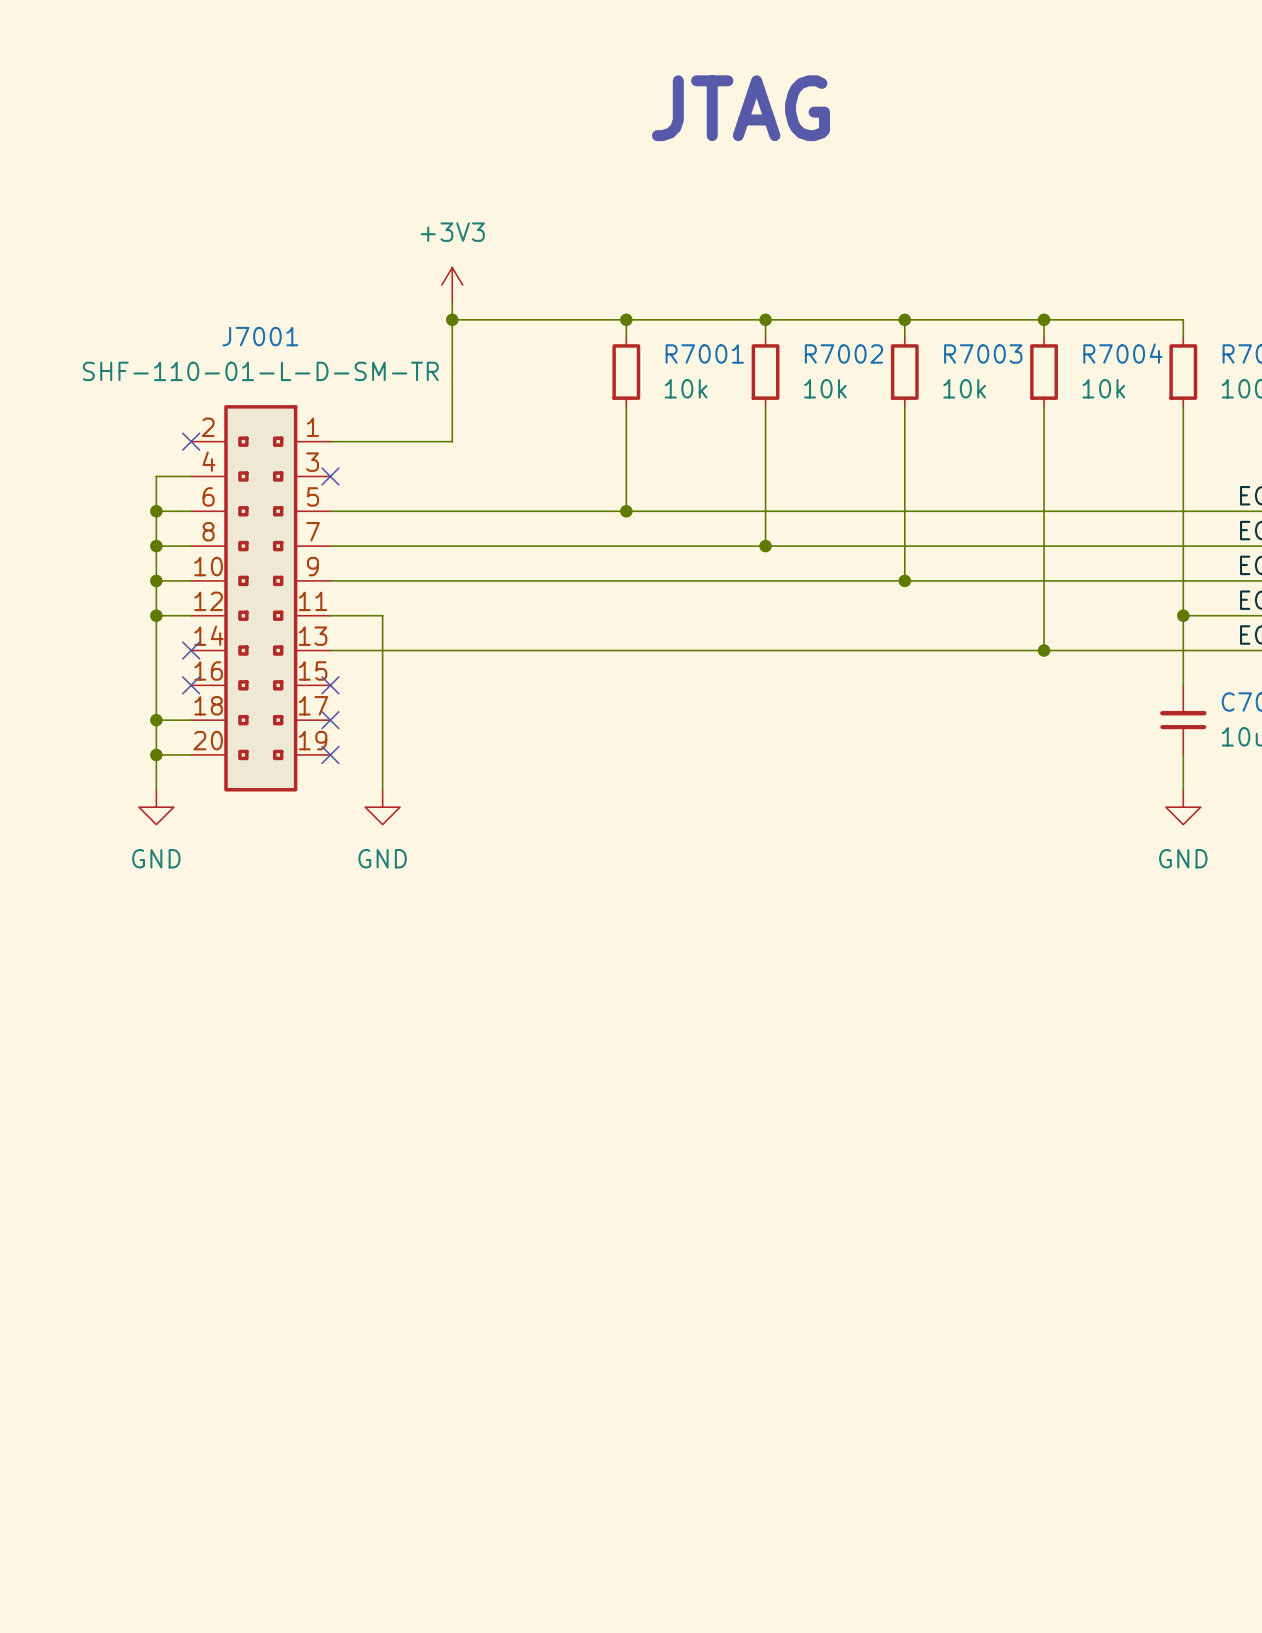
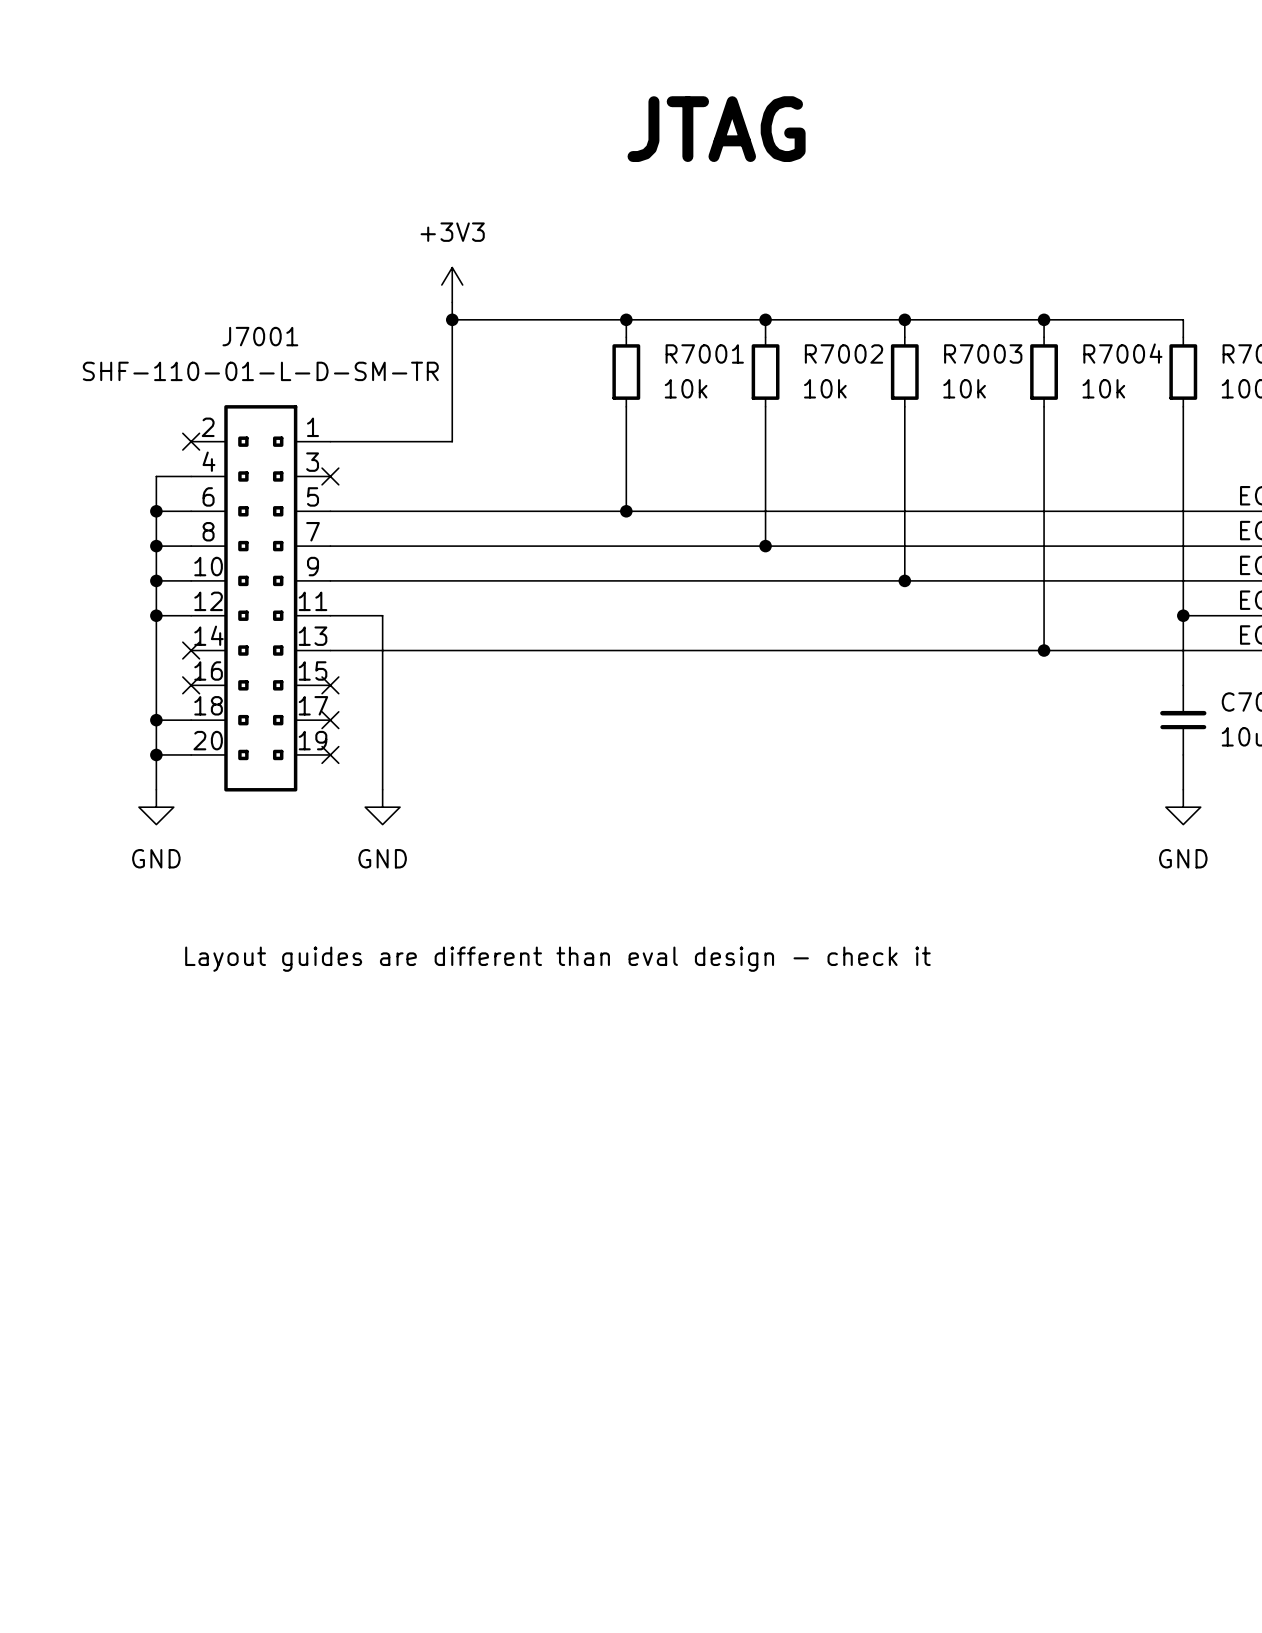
text position: JTAG (740, 108) -> JTAG (716, 129)
text: none -> Layout guides are different than eval design - check it (557, 959)

